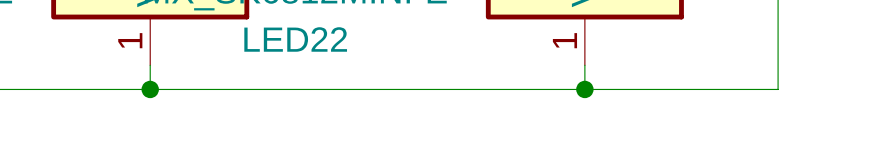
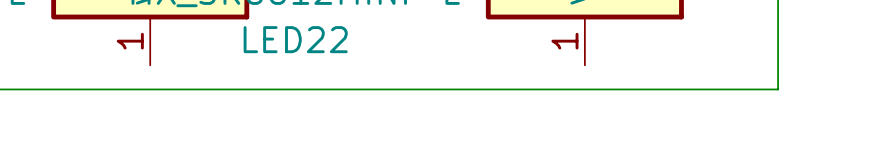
wire: (150, 65) (150, 89) -> none
wire: (584, 65) (584, 89) -> none
junction: (150, 89) -> none
junction: (584, 89) -> none

